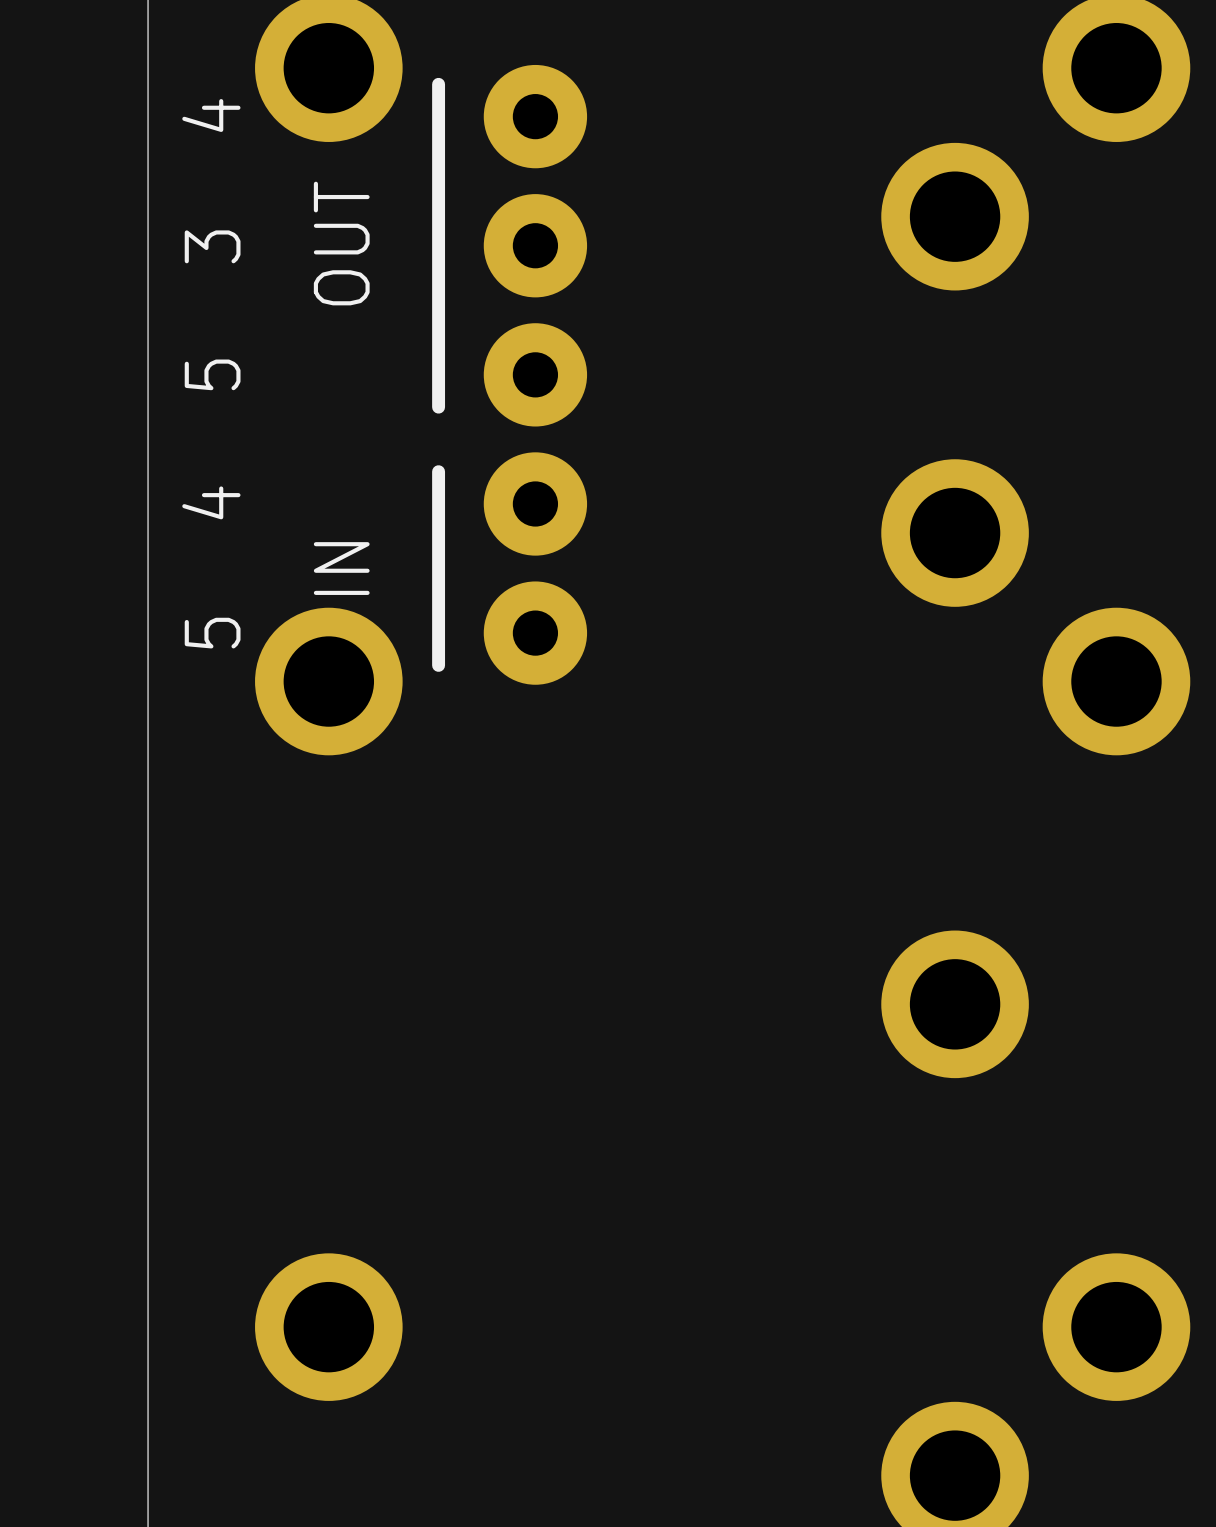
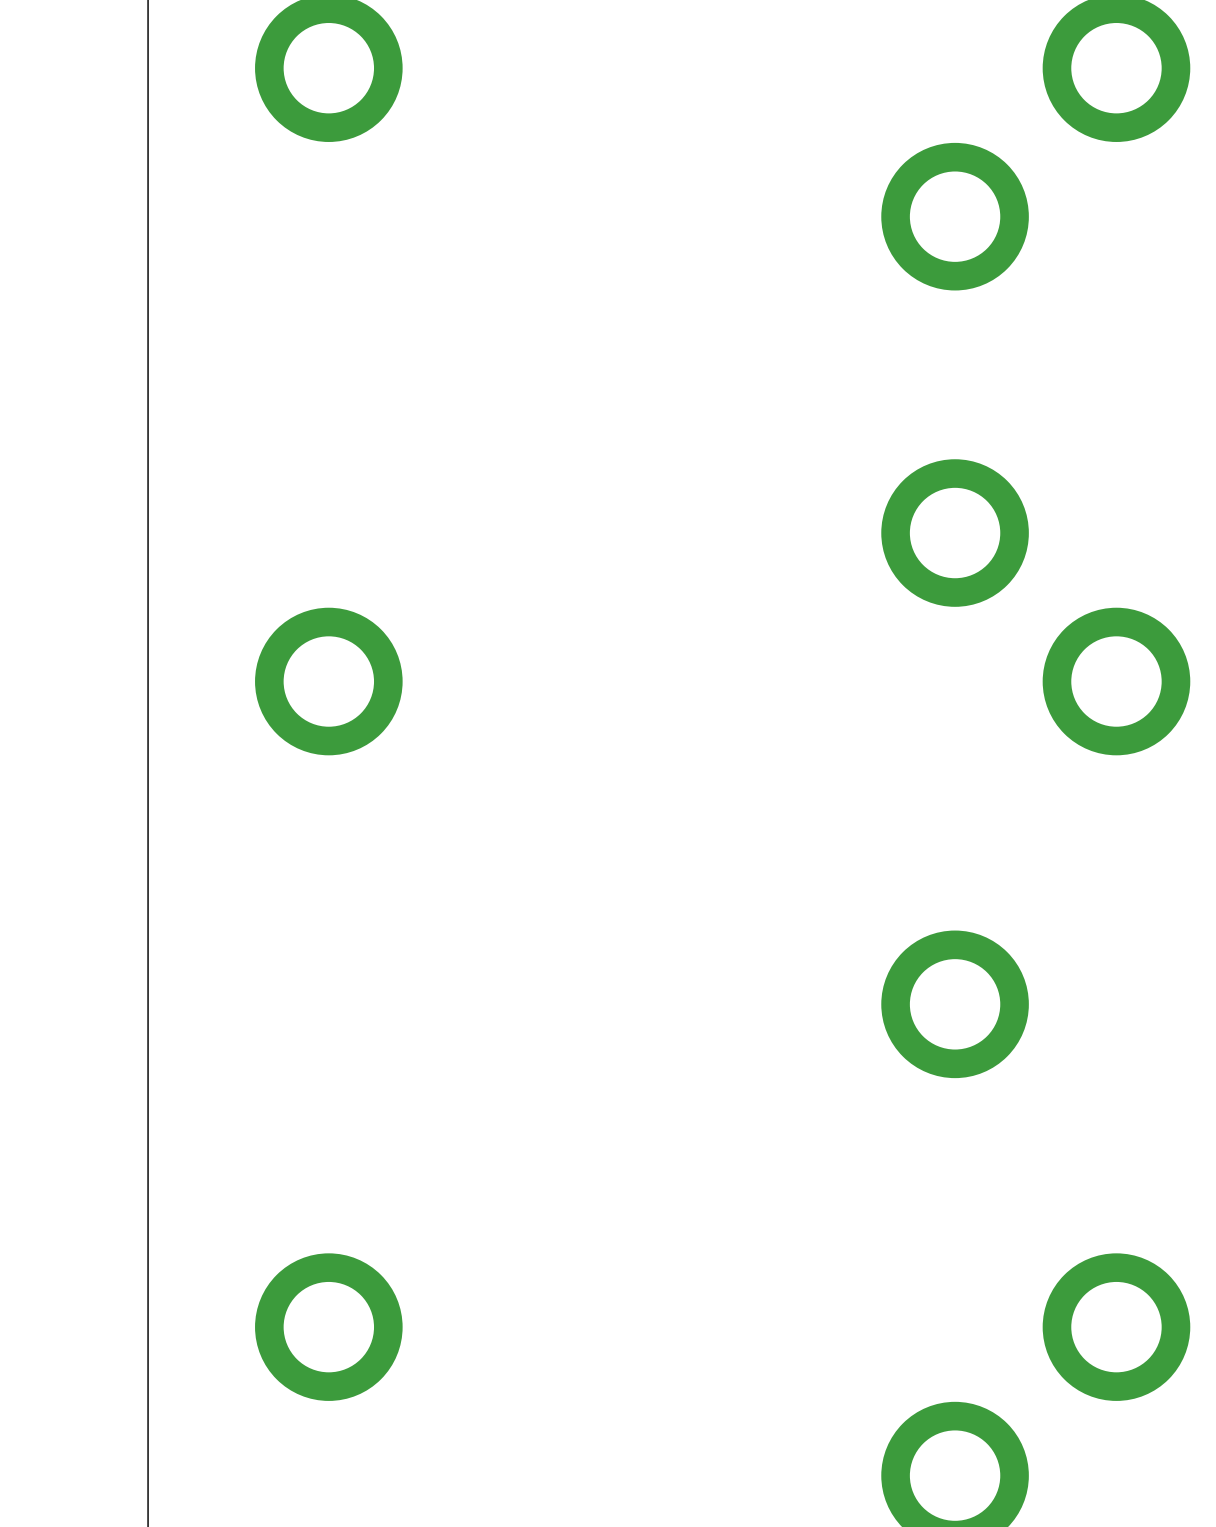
line: (438, 84) (438, 407) -> none
text: 4 (211, 115) -> none
text: OUT (341, 243) -> none
text: 3 (212, 246) -> none
text: 5 (212, 374) -> none
part: (535, 374) -> none
line: (438, 471) (438, 665) -> none
text: 4 (211, 502) -> none
text: IN (341, 568) -> none
text: 5 (212, 633) -> none

